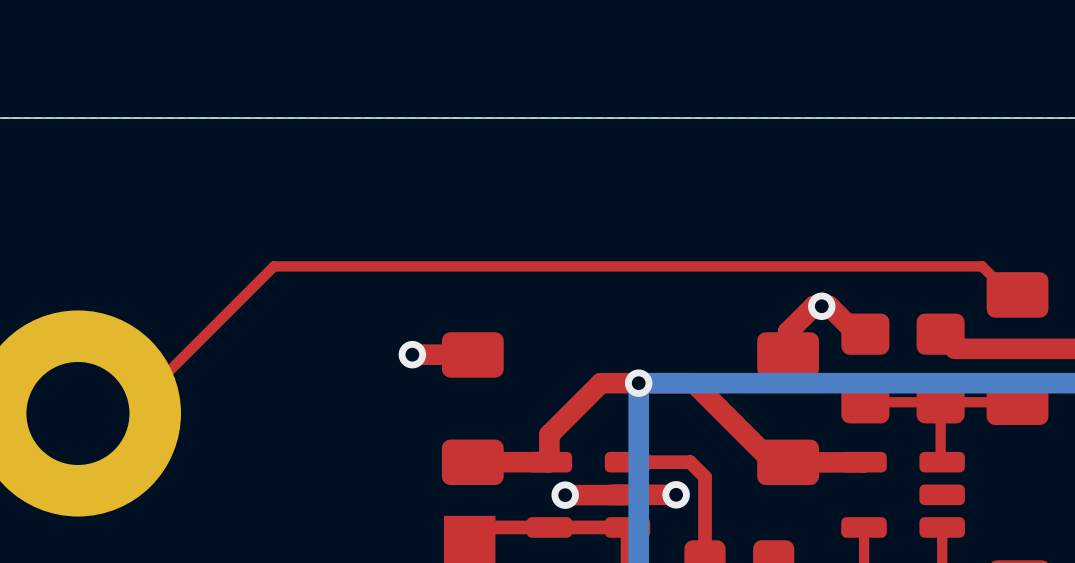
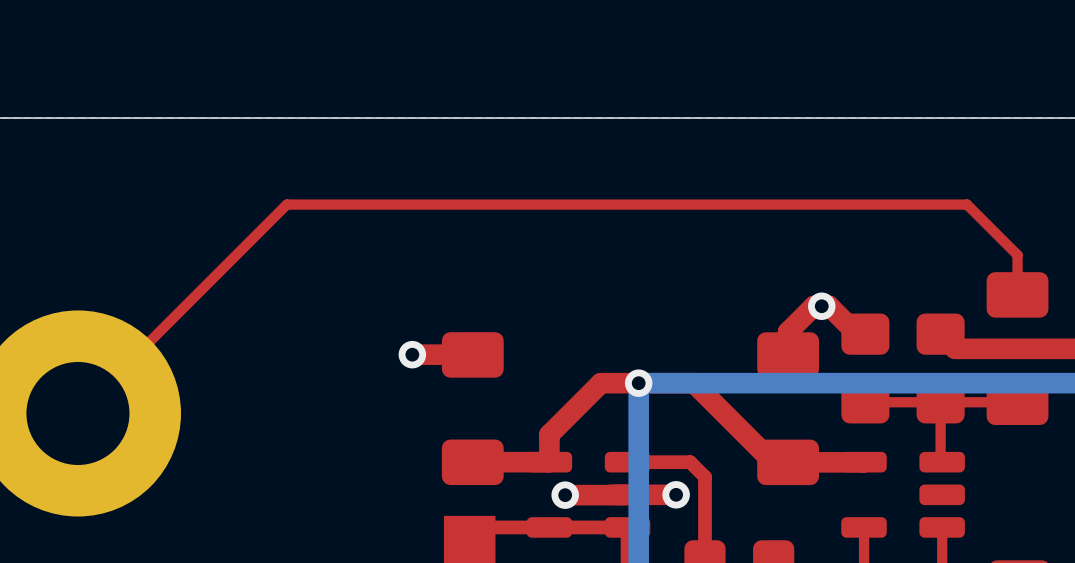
top track: (1017, 294) (1010, 294) (982, 266) (273, 266) (126, 413) (77, 413) -> (1017, 294) (1017, 255) (967, 204) (286, 204) (77, 413)

